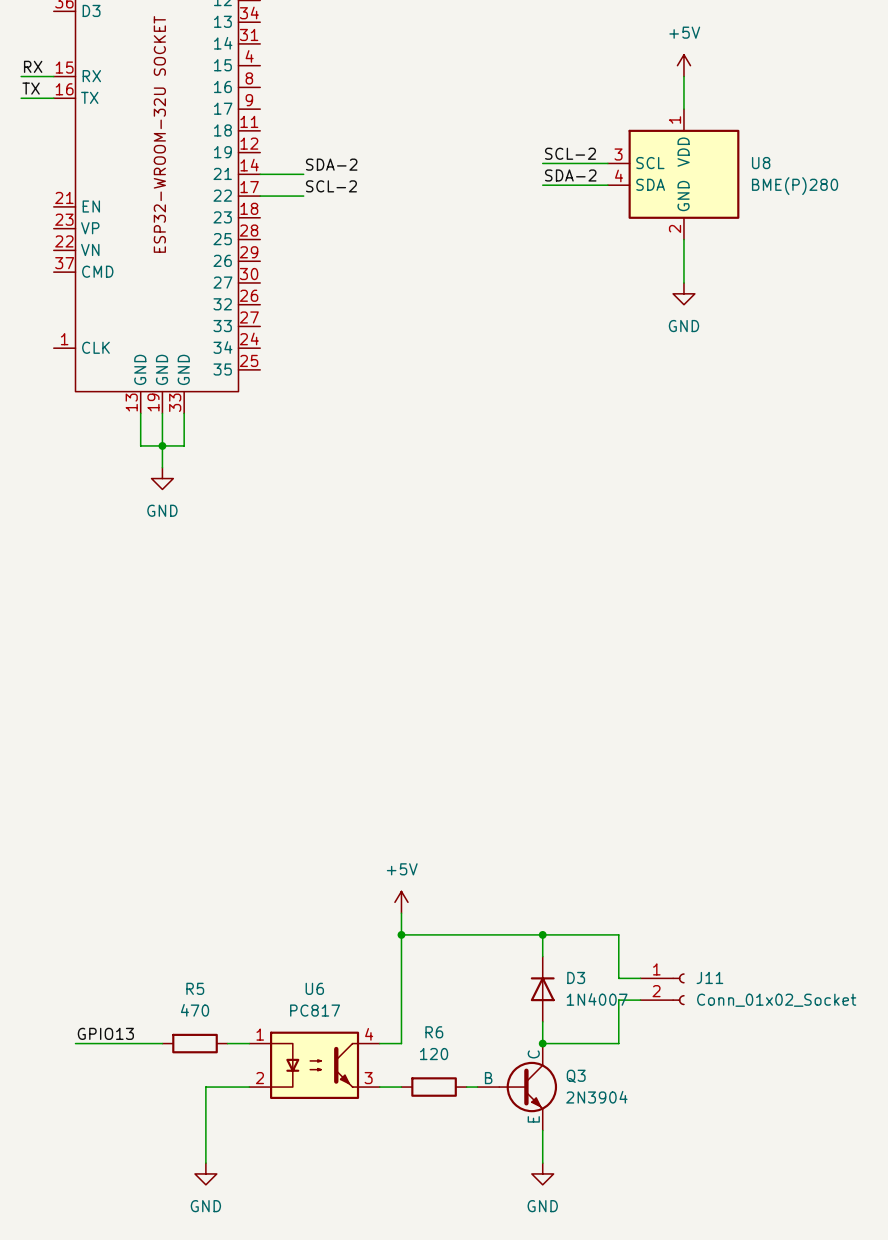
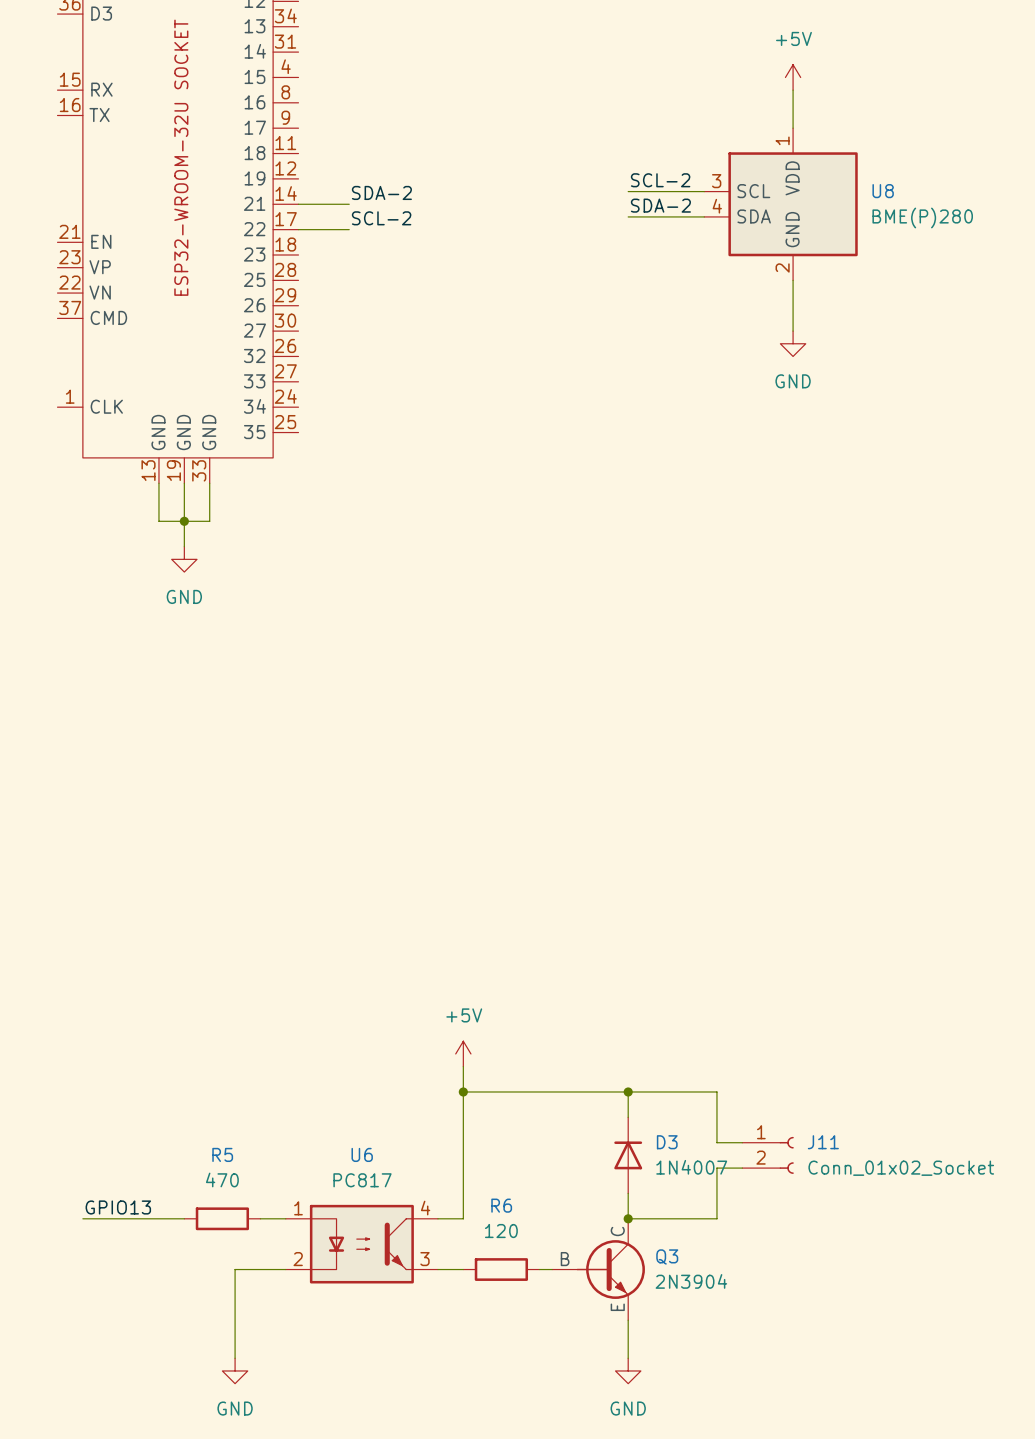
label: RX (33, 66) -> none
wire: (21, 76) (53, 76) -> none
label: TX (31, 88) -> none
wire: (21, 98) (53, 98) -> none

